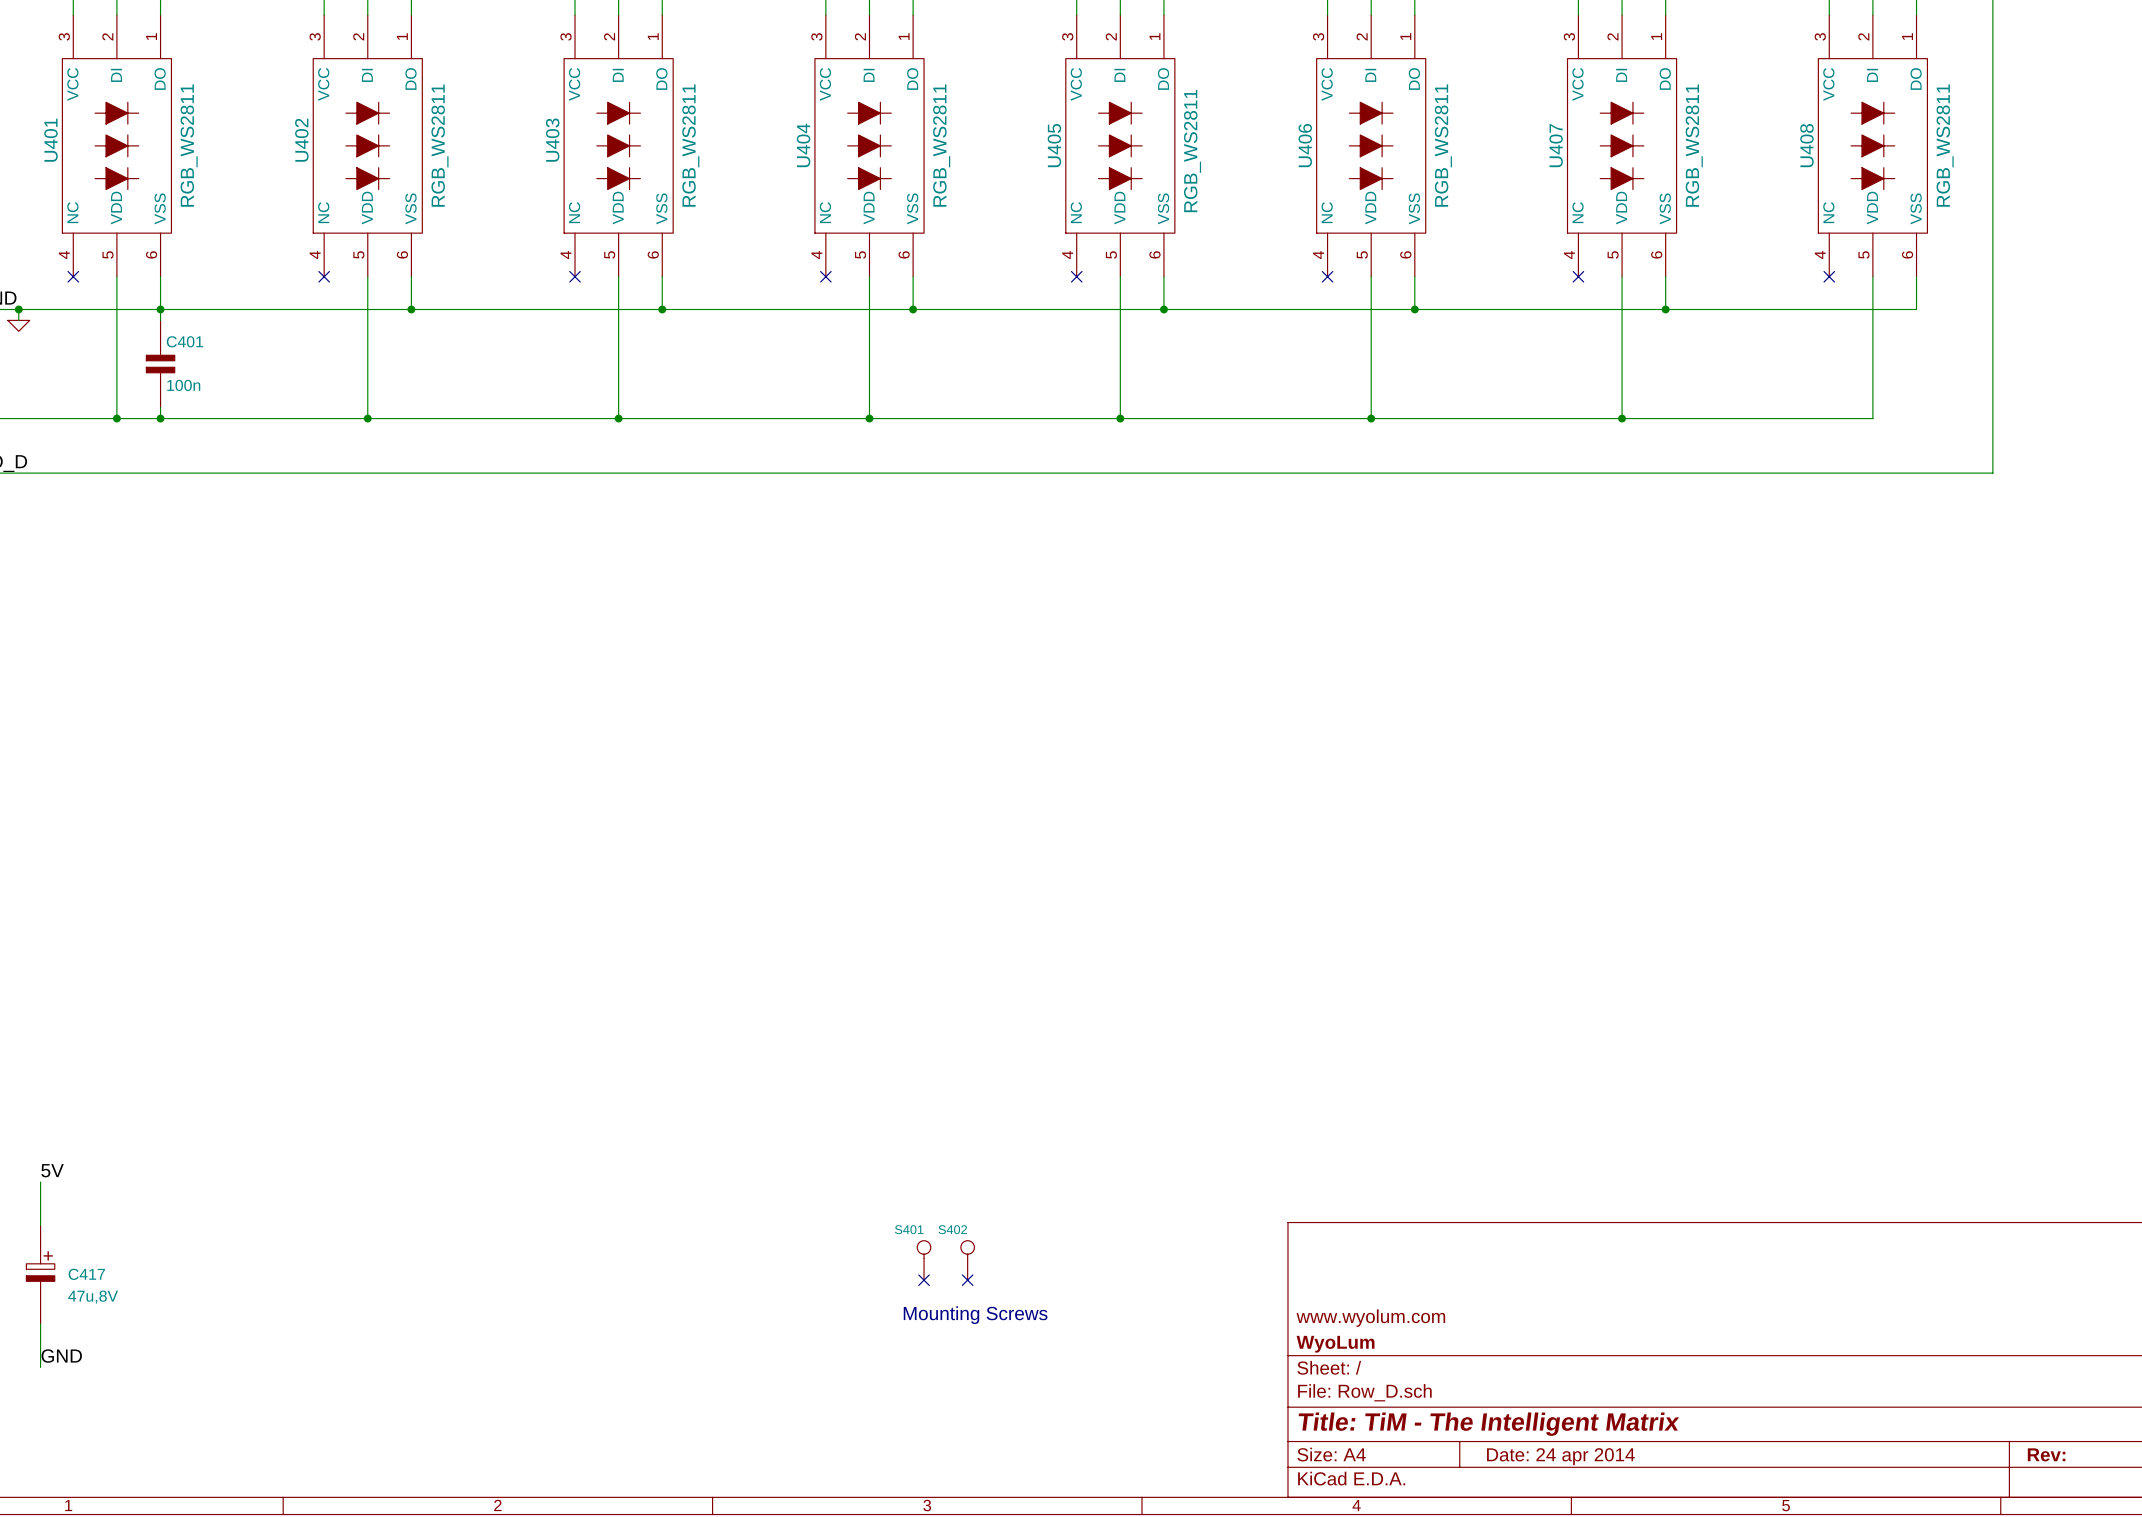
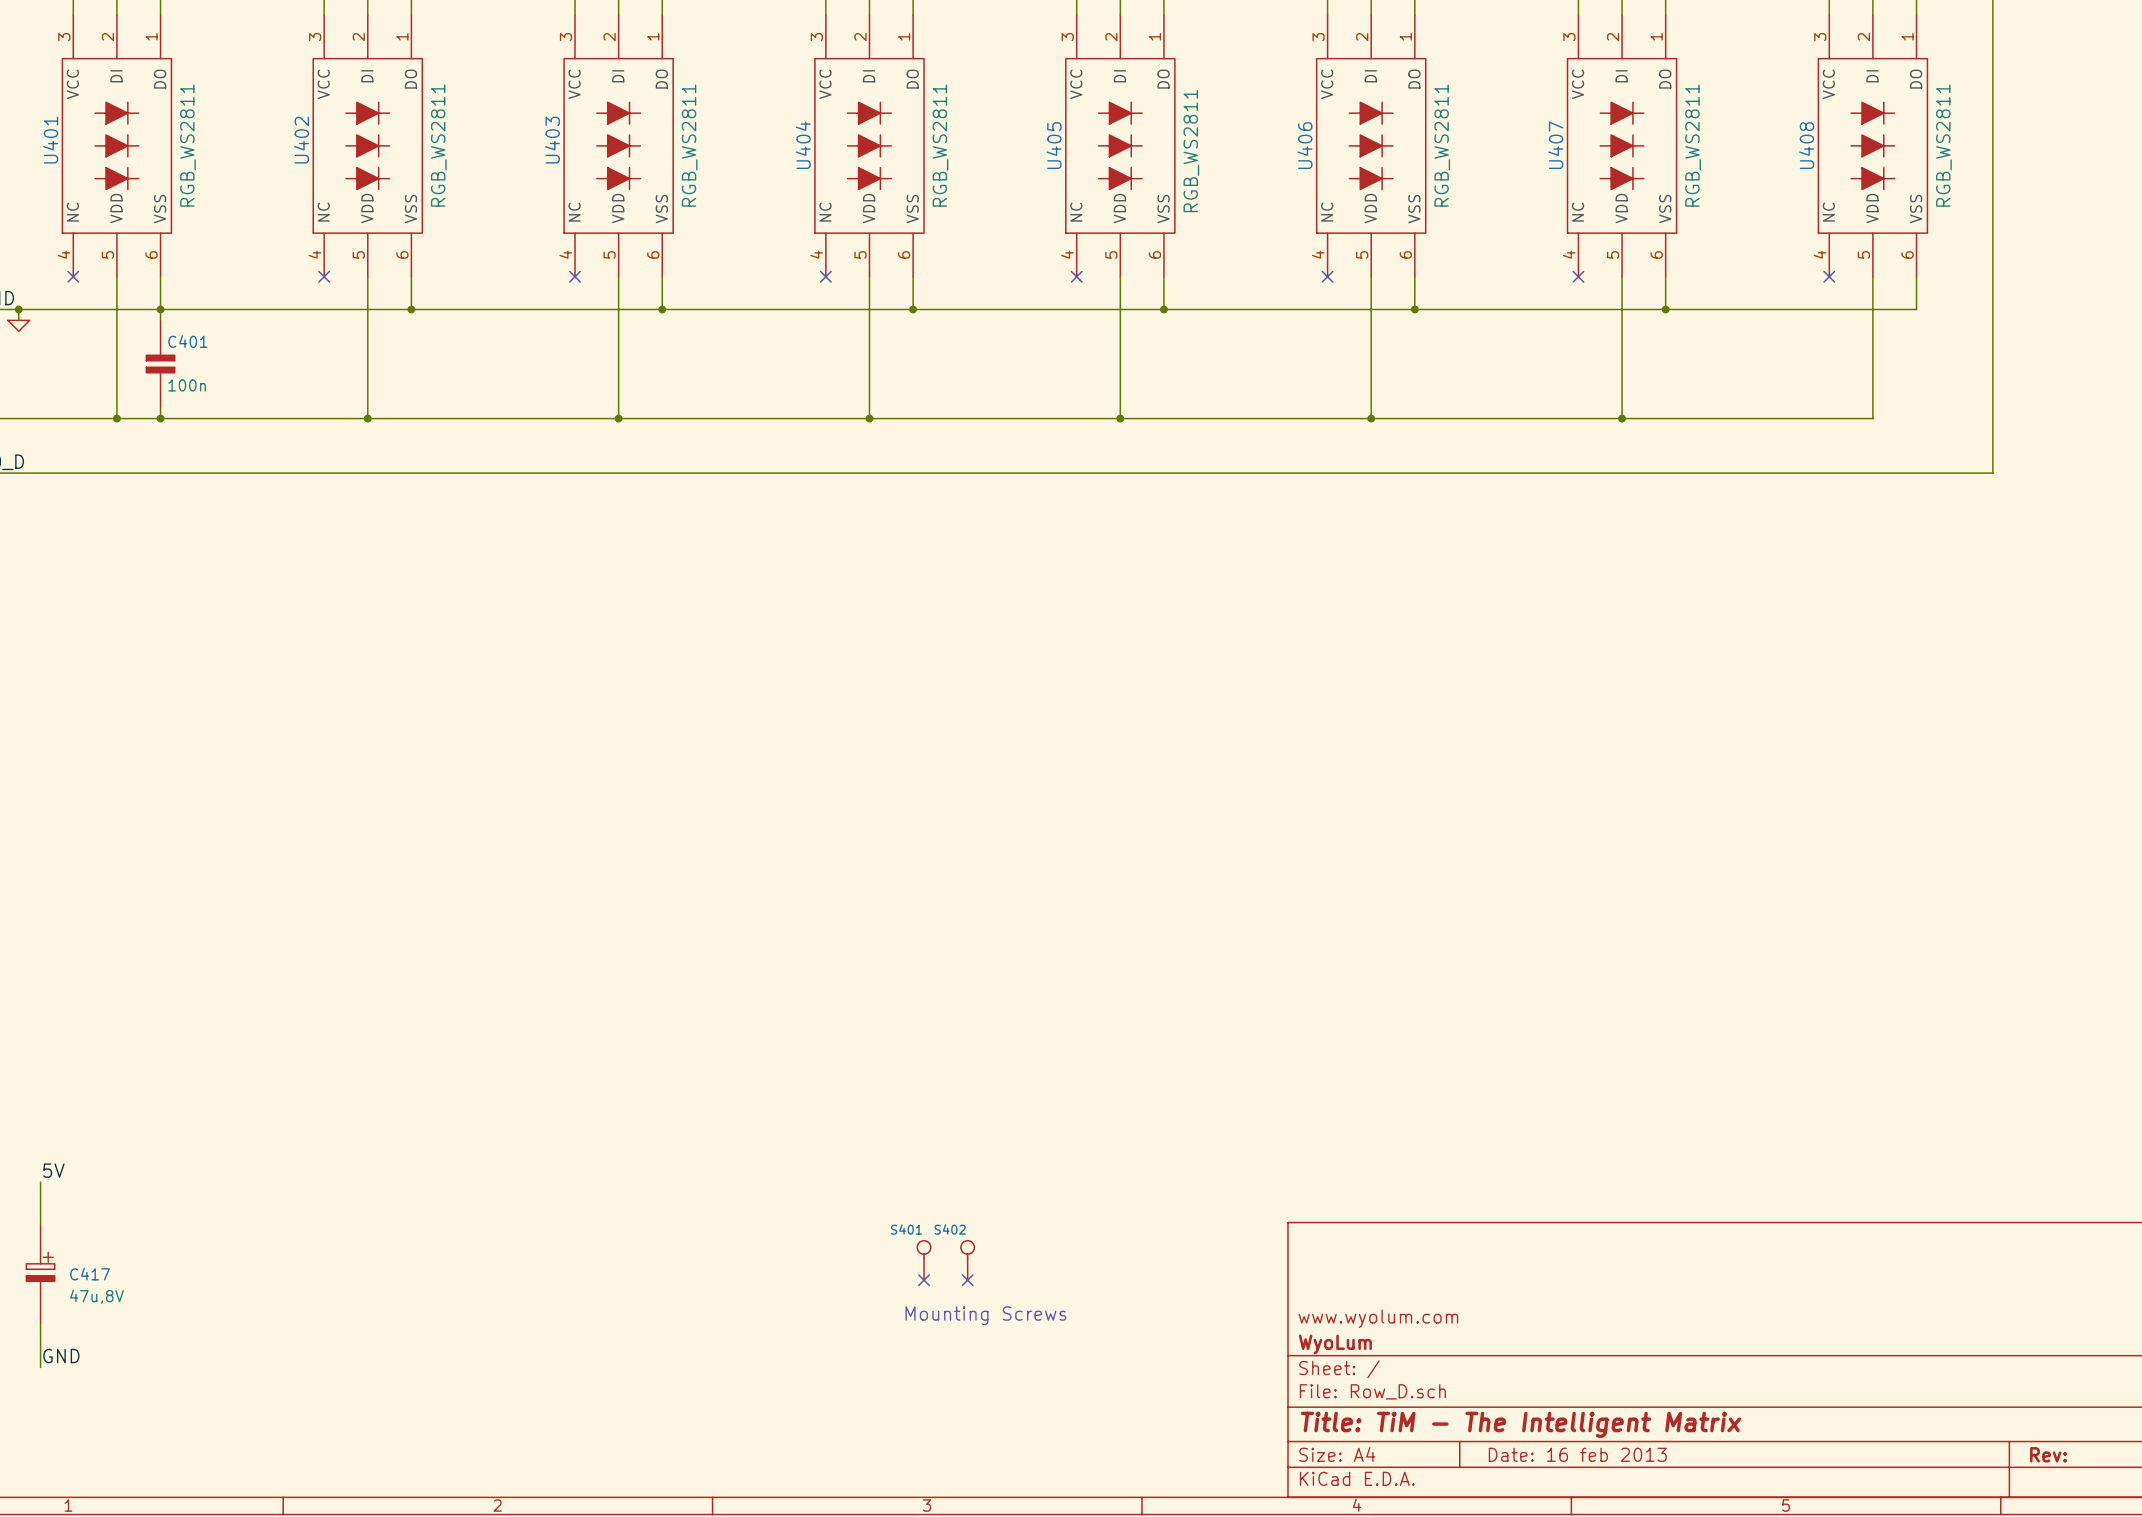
title block: Date: 24 apr 2014 (1560, 1456) -> Date: 16 feb 2013 (1577, 1454)

